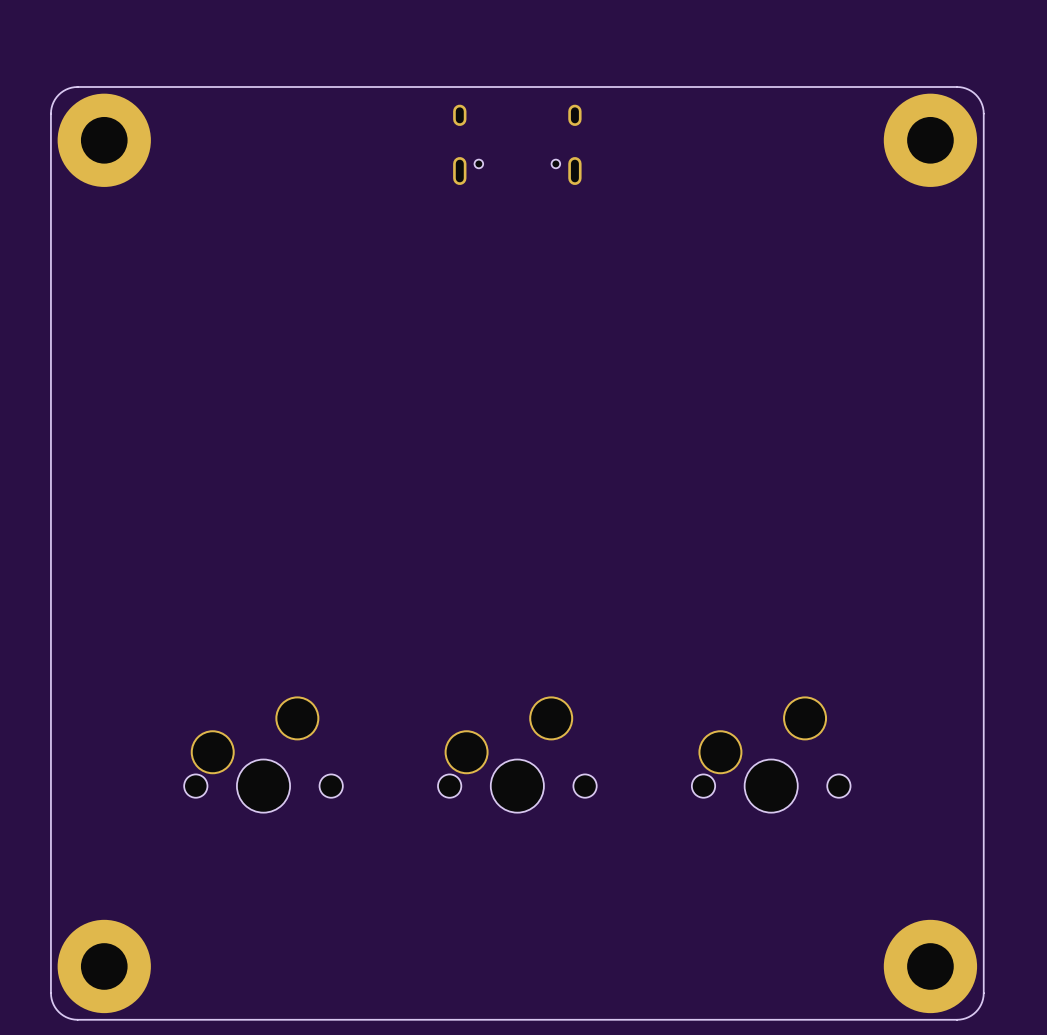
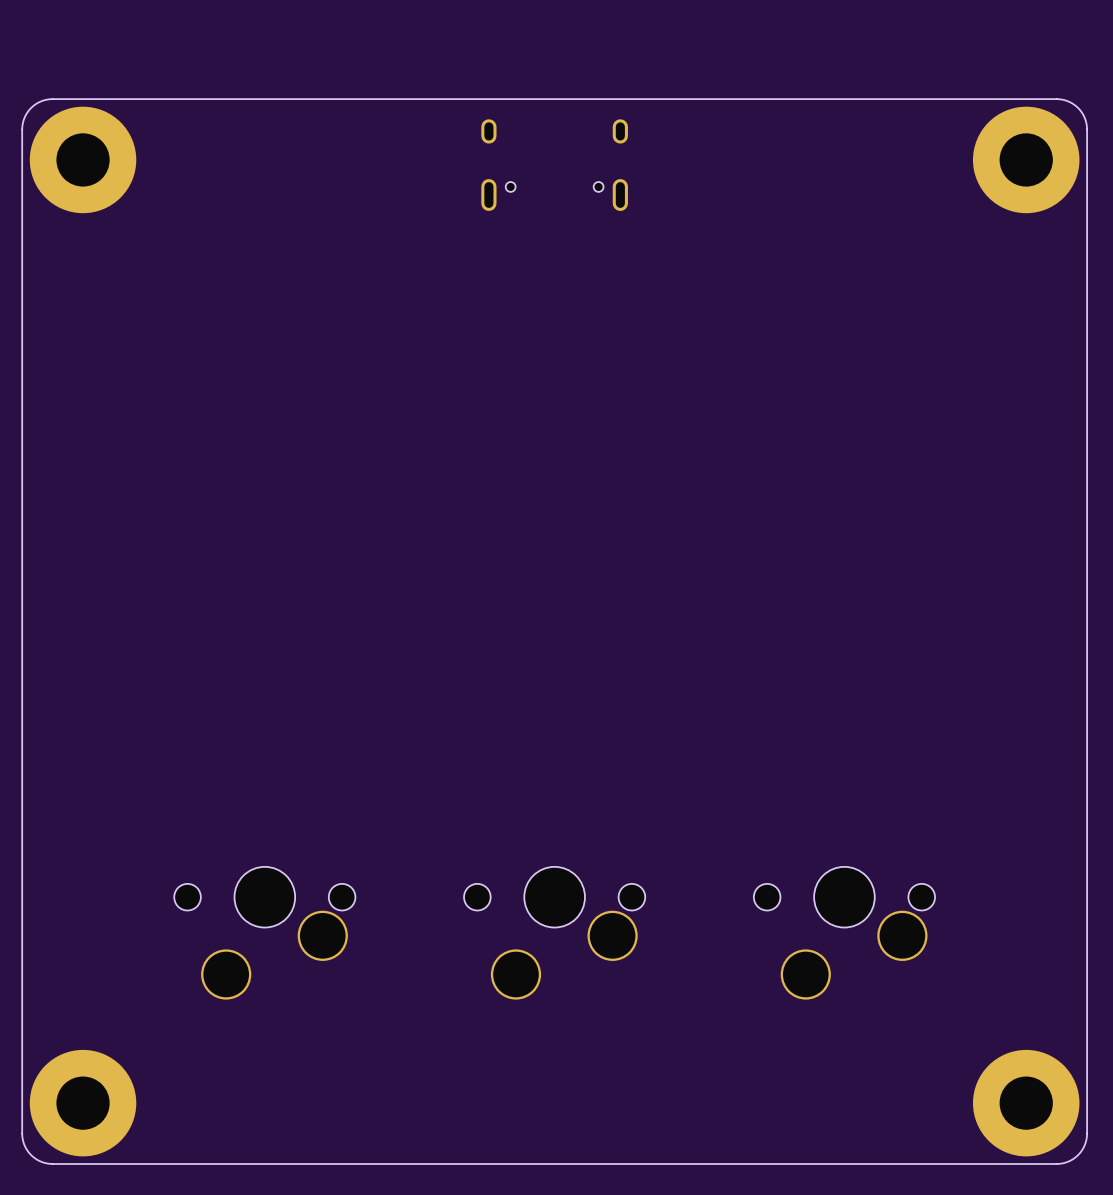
part rotation: 0° (263, 754) -> 180° (264, 933)
part rotation: 0° (517, 754) -> 180° (554, 933)
part rotation: 0° (771, 754) -> 180° (844, 933)

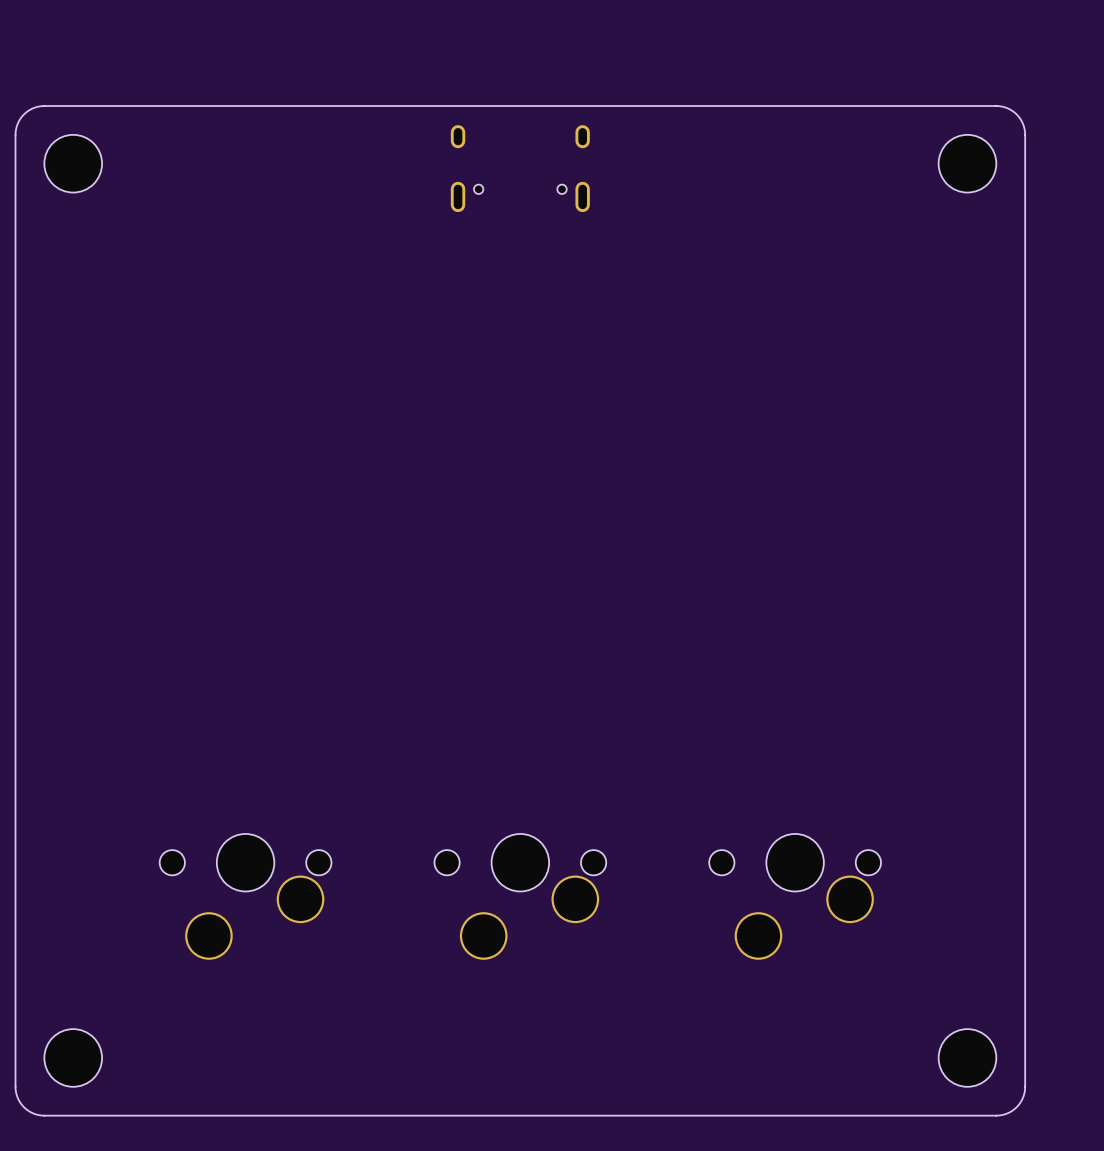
part footprint: [29, 106, 137, 214] -> [44, 134, 103, 193]
part footprint: [972, 106, 1080, 214] -> [938, 134, 997, 193]
part footprint: [29, 1049, 137, 1157] -> [44, 1029, 103, 1087]
part footprint: [972, 1049, 1080, 1157] -> [938, 1029, 997, 1087]

